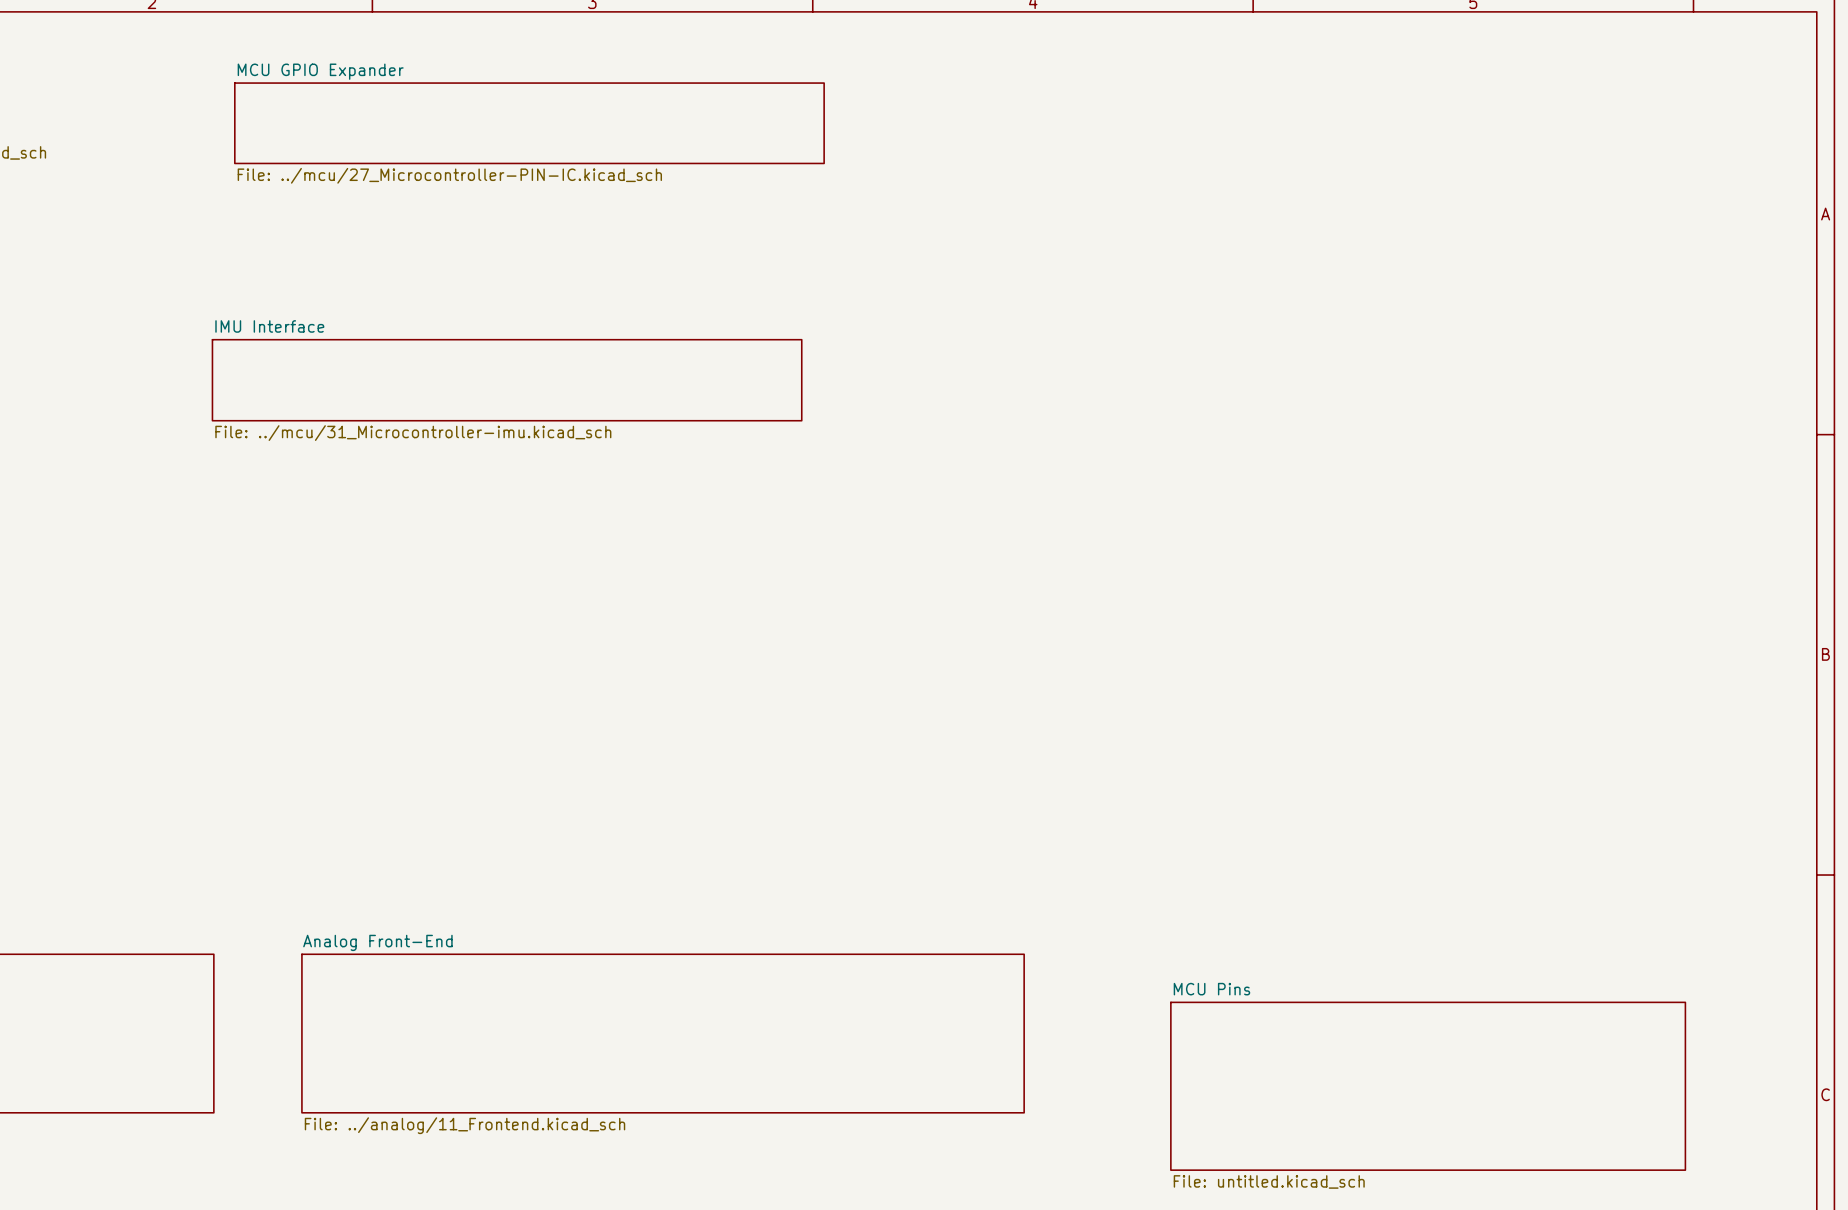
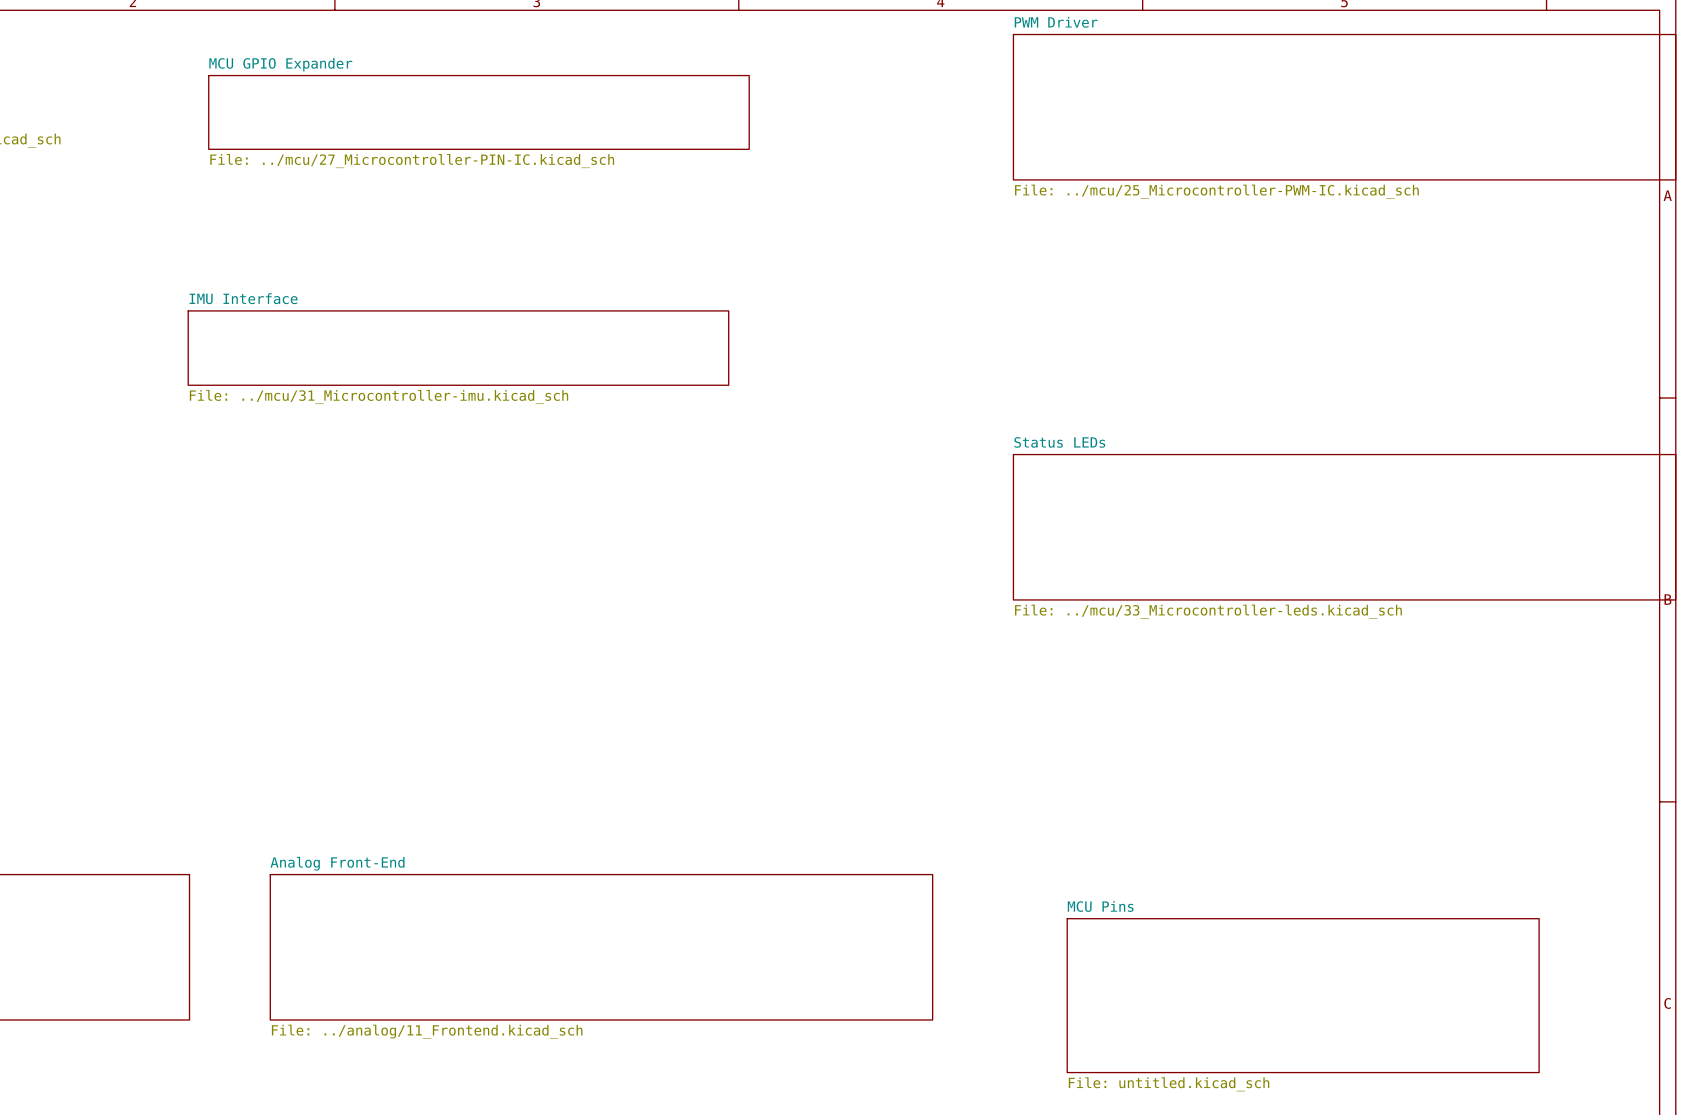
sheet PWM Driver: none -> File: ../mcu/25_Microcontroller-PWM-IC.kicad_sch (1344, 107)
sheet Status LEDs: none -> File: ../mcu/33_Microcontroller-leds.kicad_sch (1344, 527)

